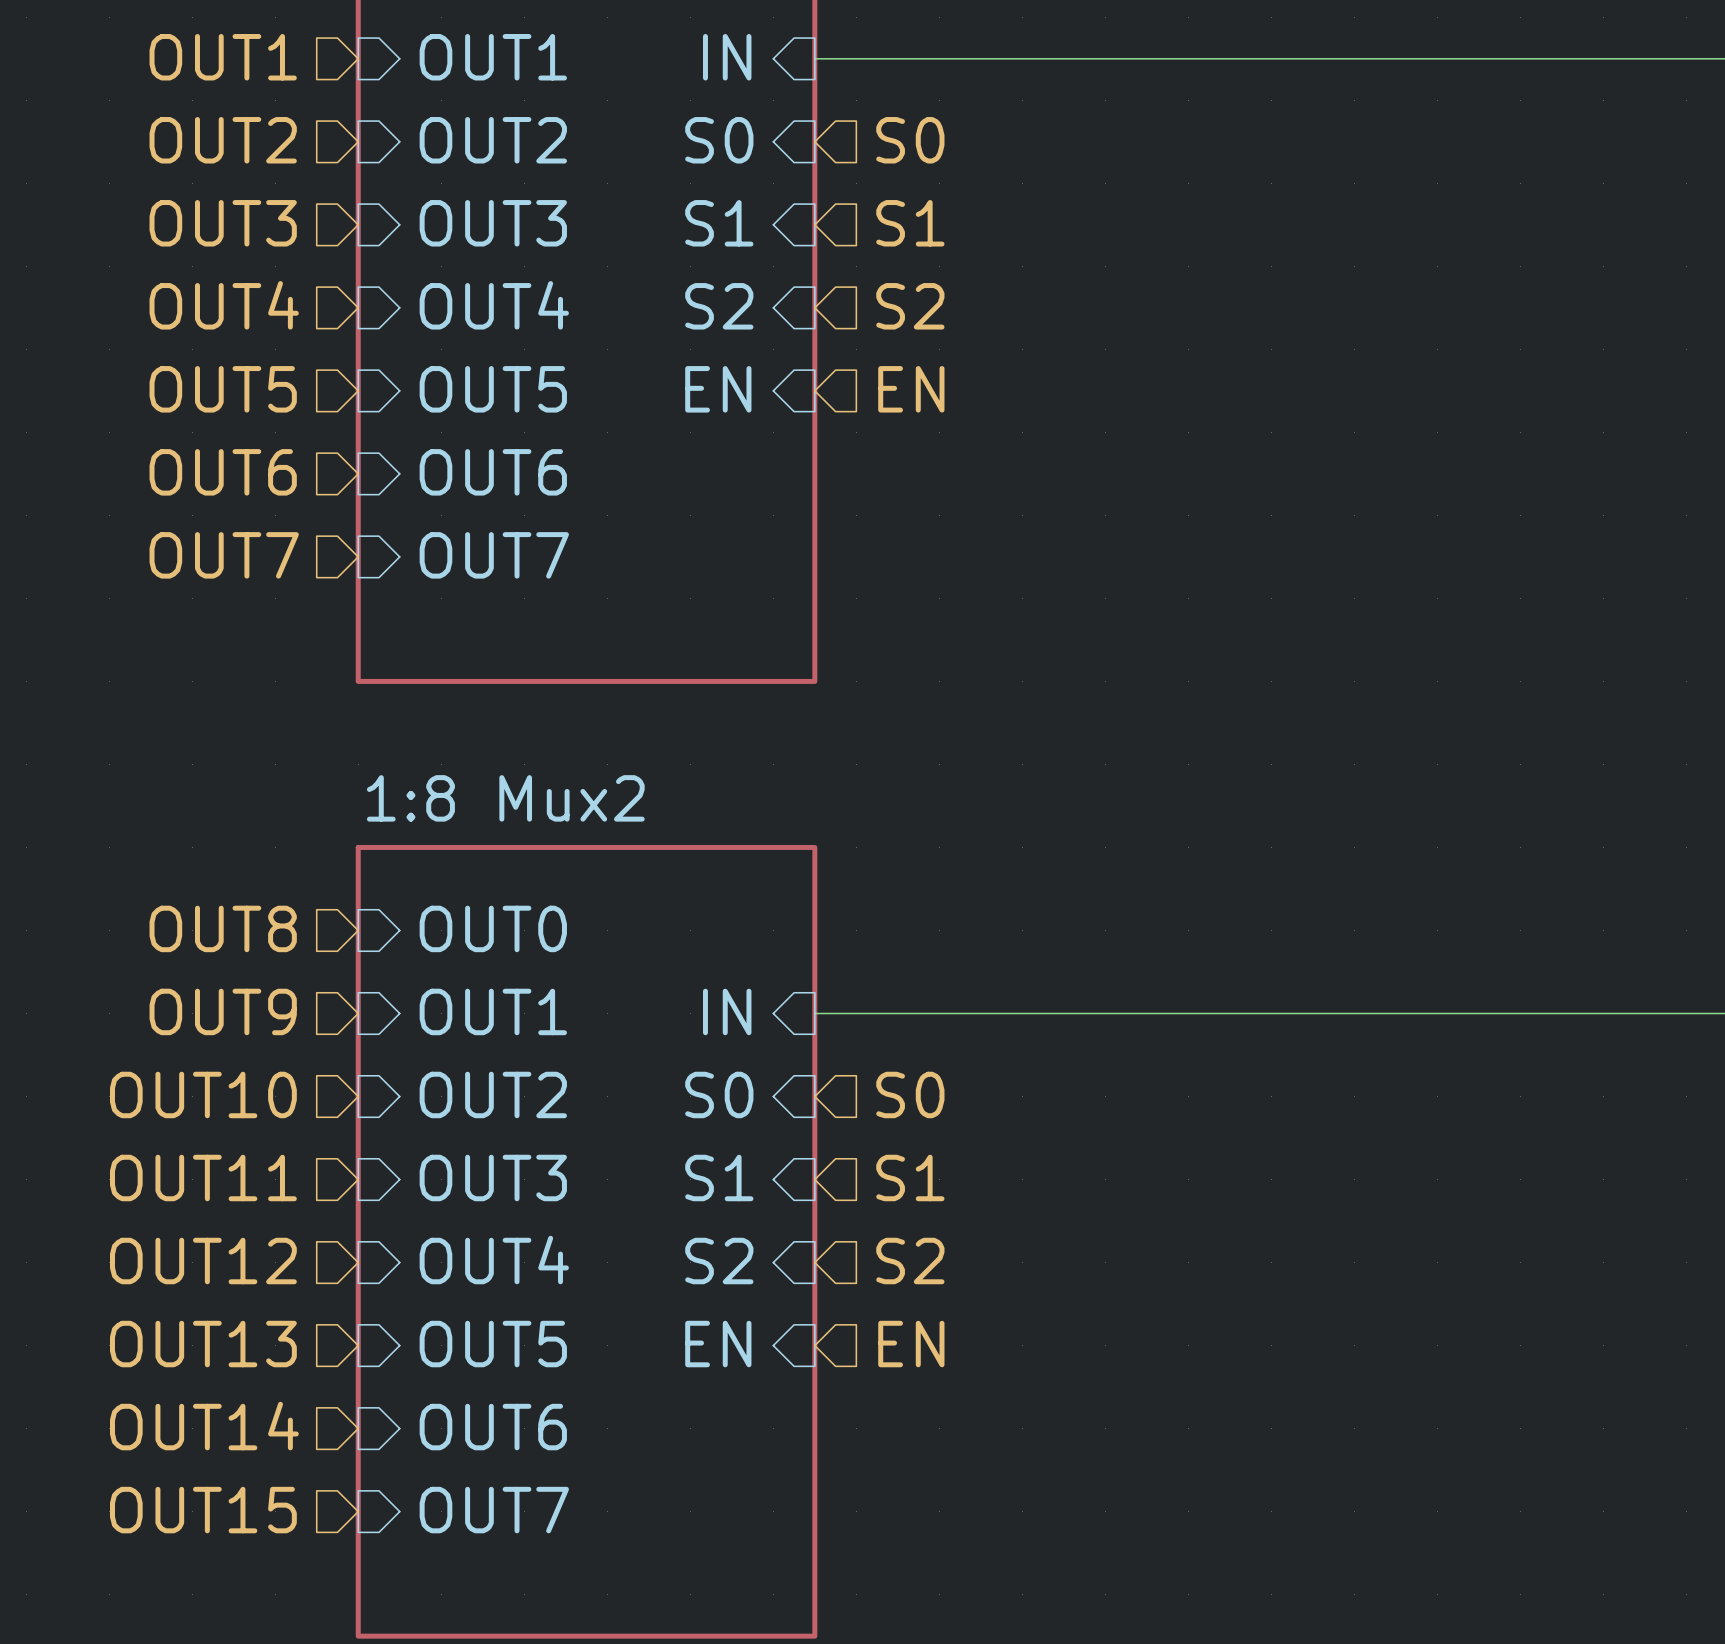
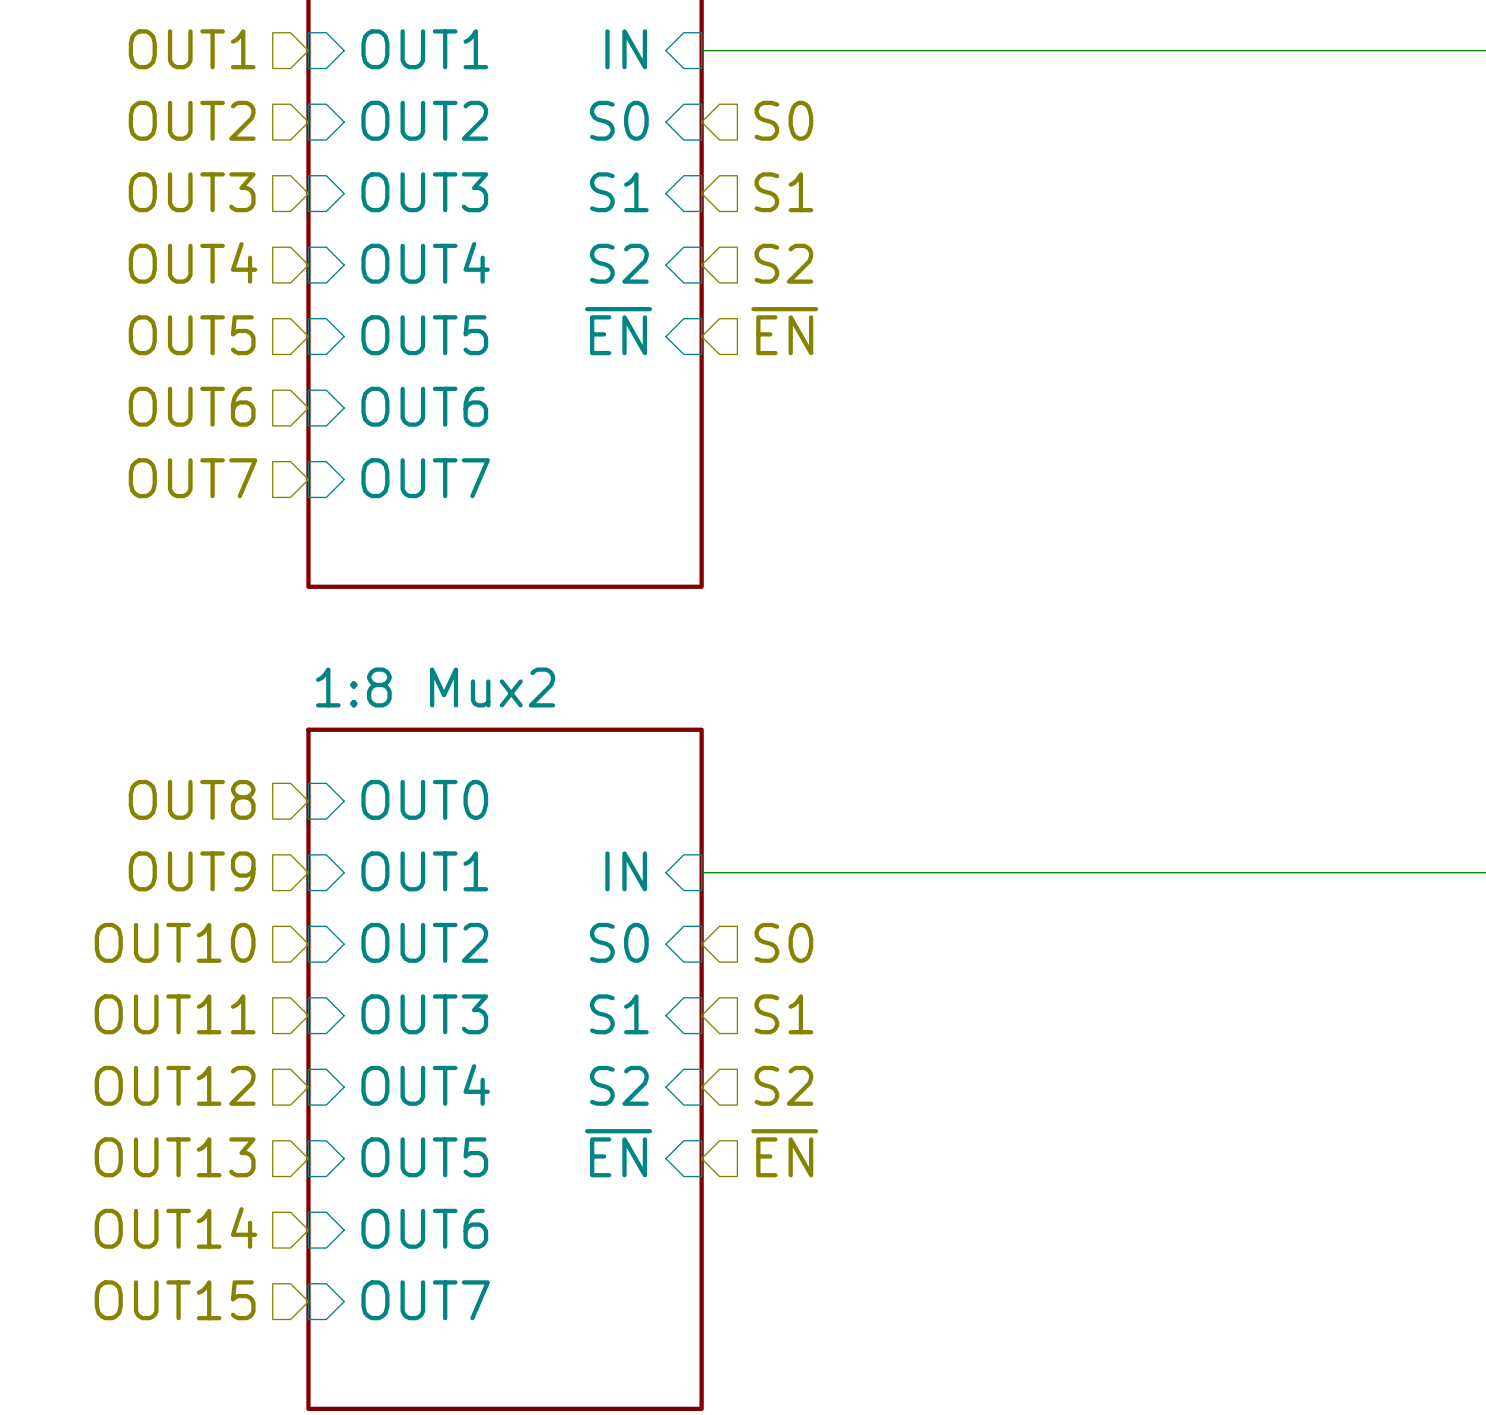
sheet pin: EN (718, 389) -> ~{EN} (618, 331)
hierarchical label: EN (911, 389) -> ~{EN} (784, 331)
sheet pin: EN (718, 1344) -> ~{EN} (618, 1153)
hierarchical label: EN (911, 1344) -> ~{EN} (784, 1153)

